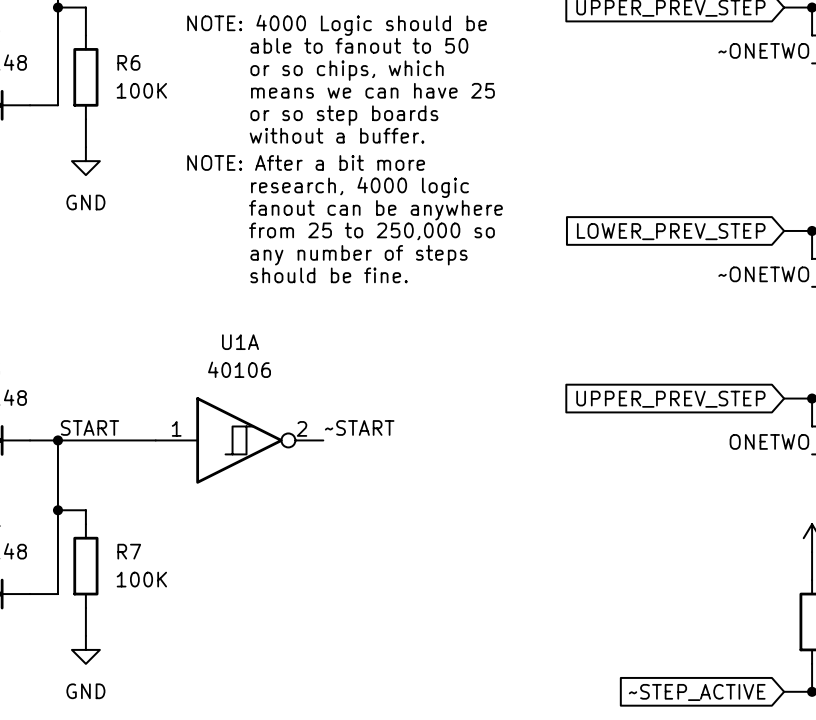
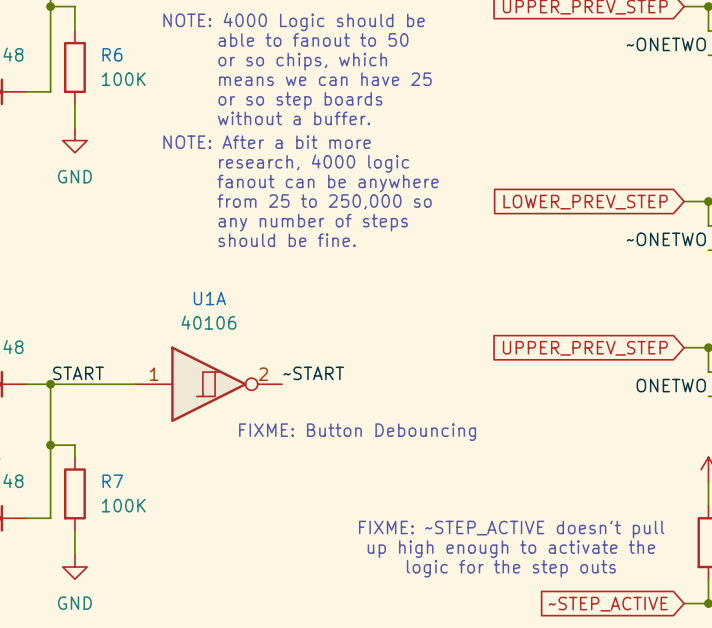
text: none -> FIXME: Button Debouncing (357, 432)
text: none -> FIXME: ~STEP_ACTIVE doesn't pull (511, 529)
text: none -> up high enough to activate the (511, 549)
text: none -> logic for the step outs (511, 568)

